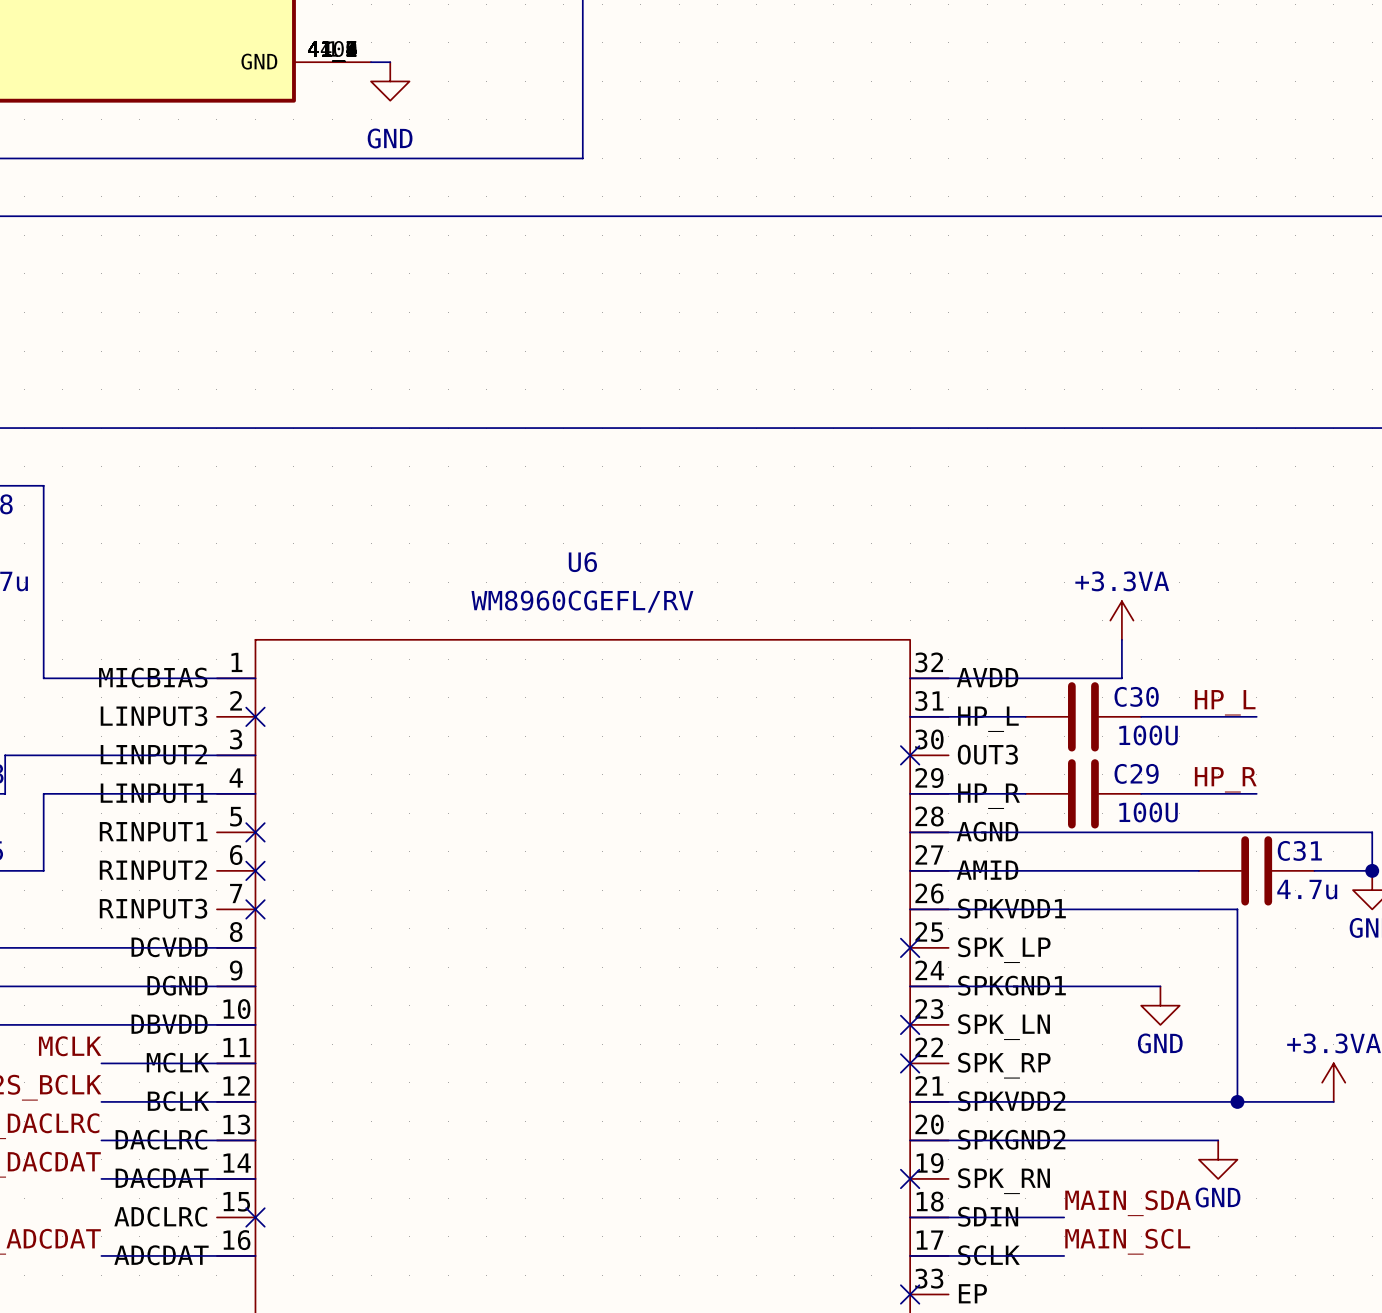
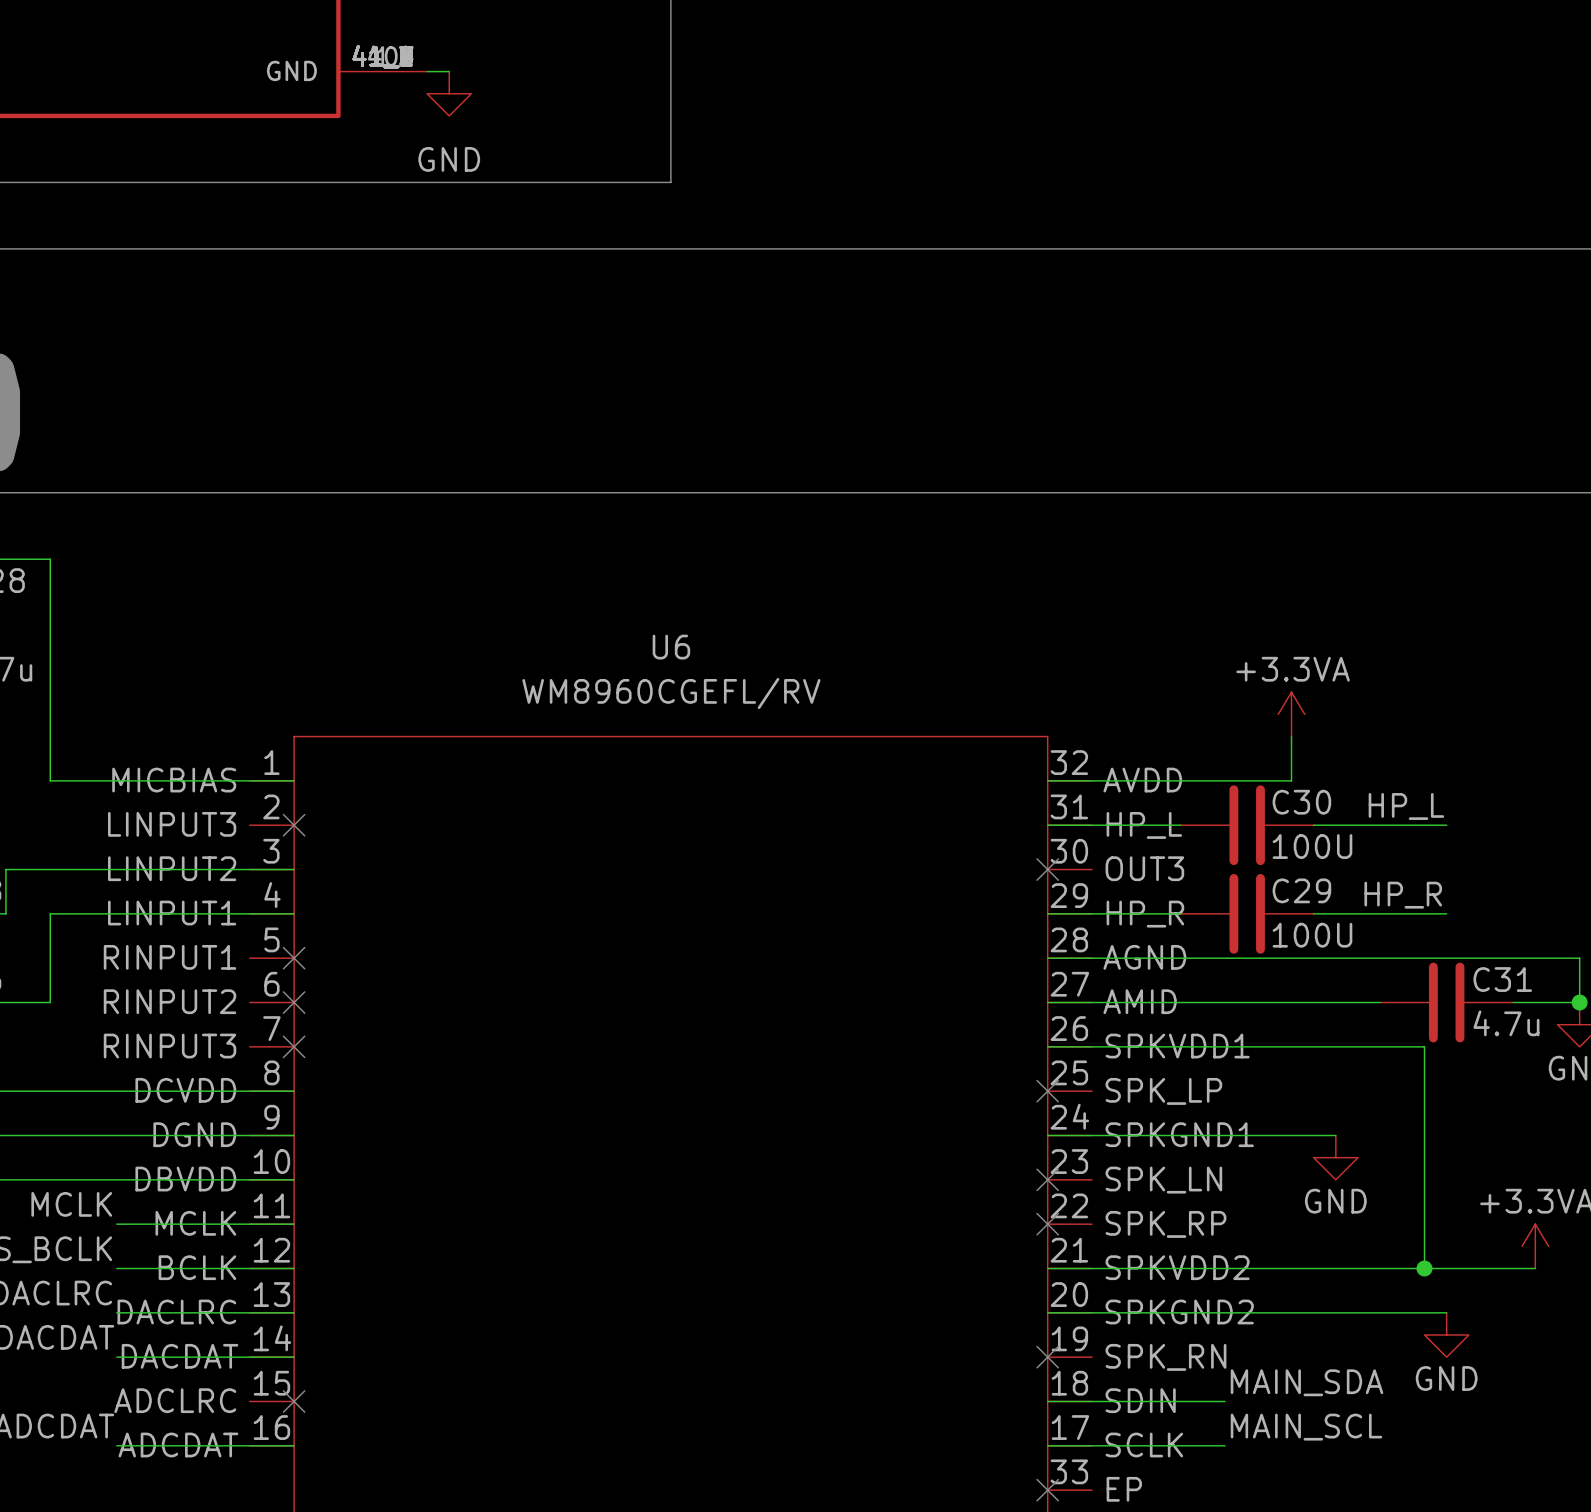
wire: none -> (1402, 1312) (1446, 1312)
power symbol position: GND (1218, 1159) -> GND (1446, 1335)

